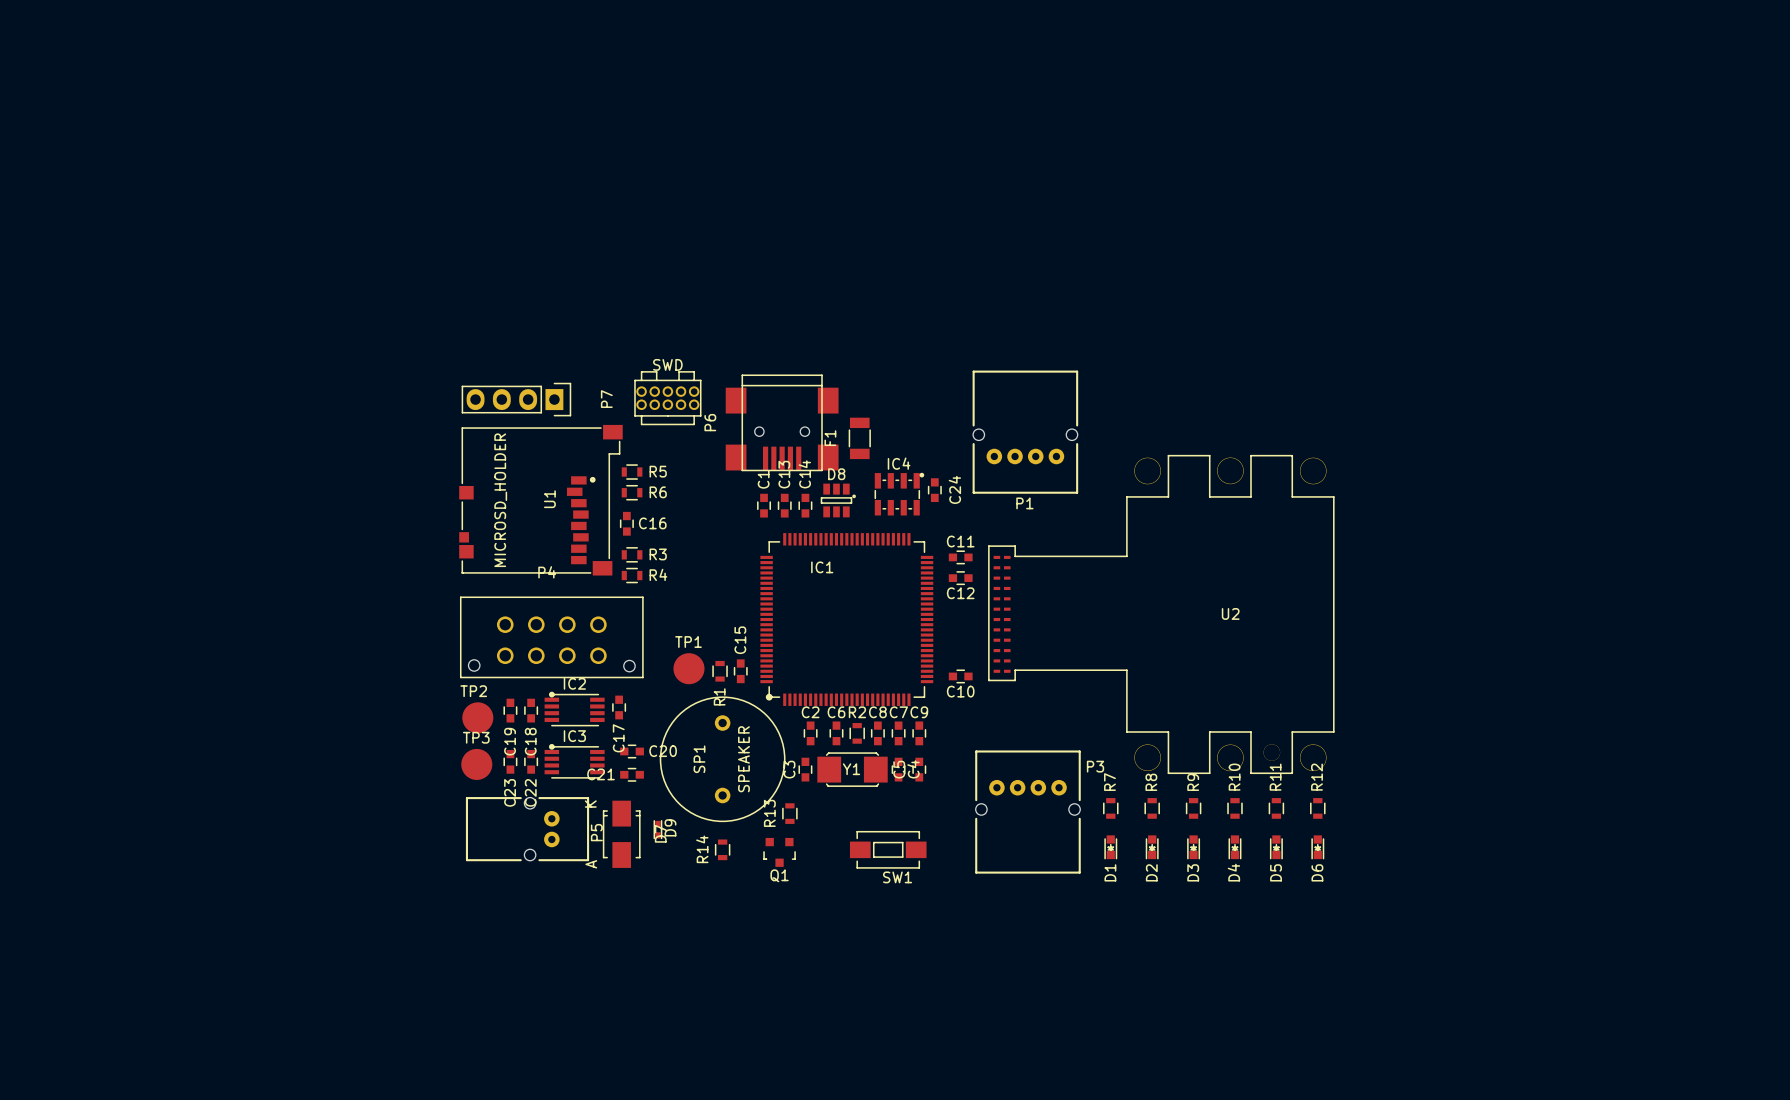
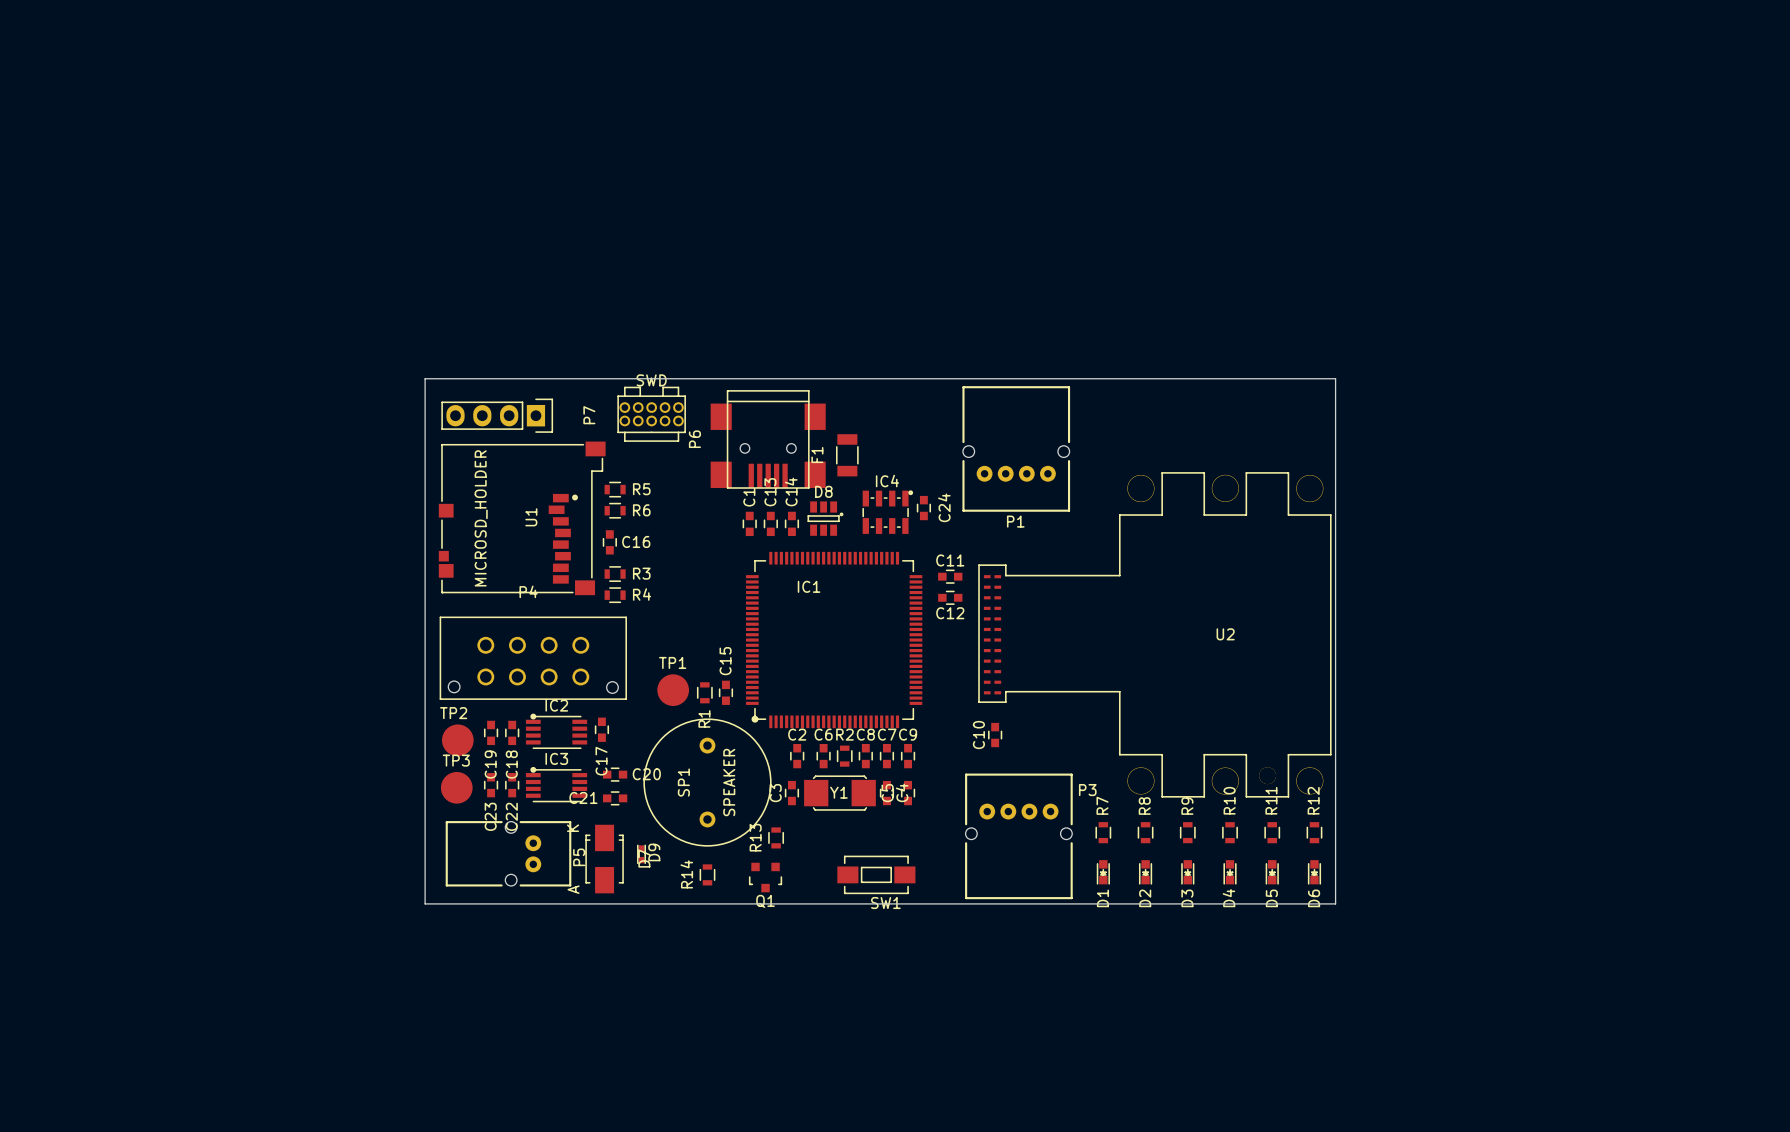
board edge: none -> (425, 378) (425, 903) (1335, 903) (1335, 378) (425, 378)
C10 rotation: 0° (960, 676) -> 90° clockwise (995, 735)
C10 position: (960, 676) -> (995, 735)

